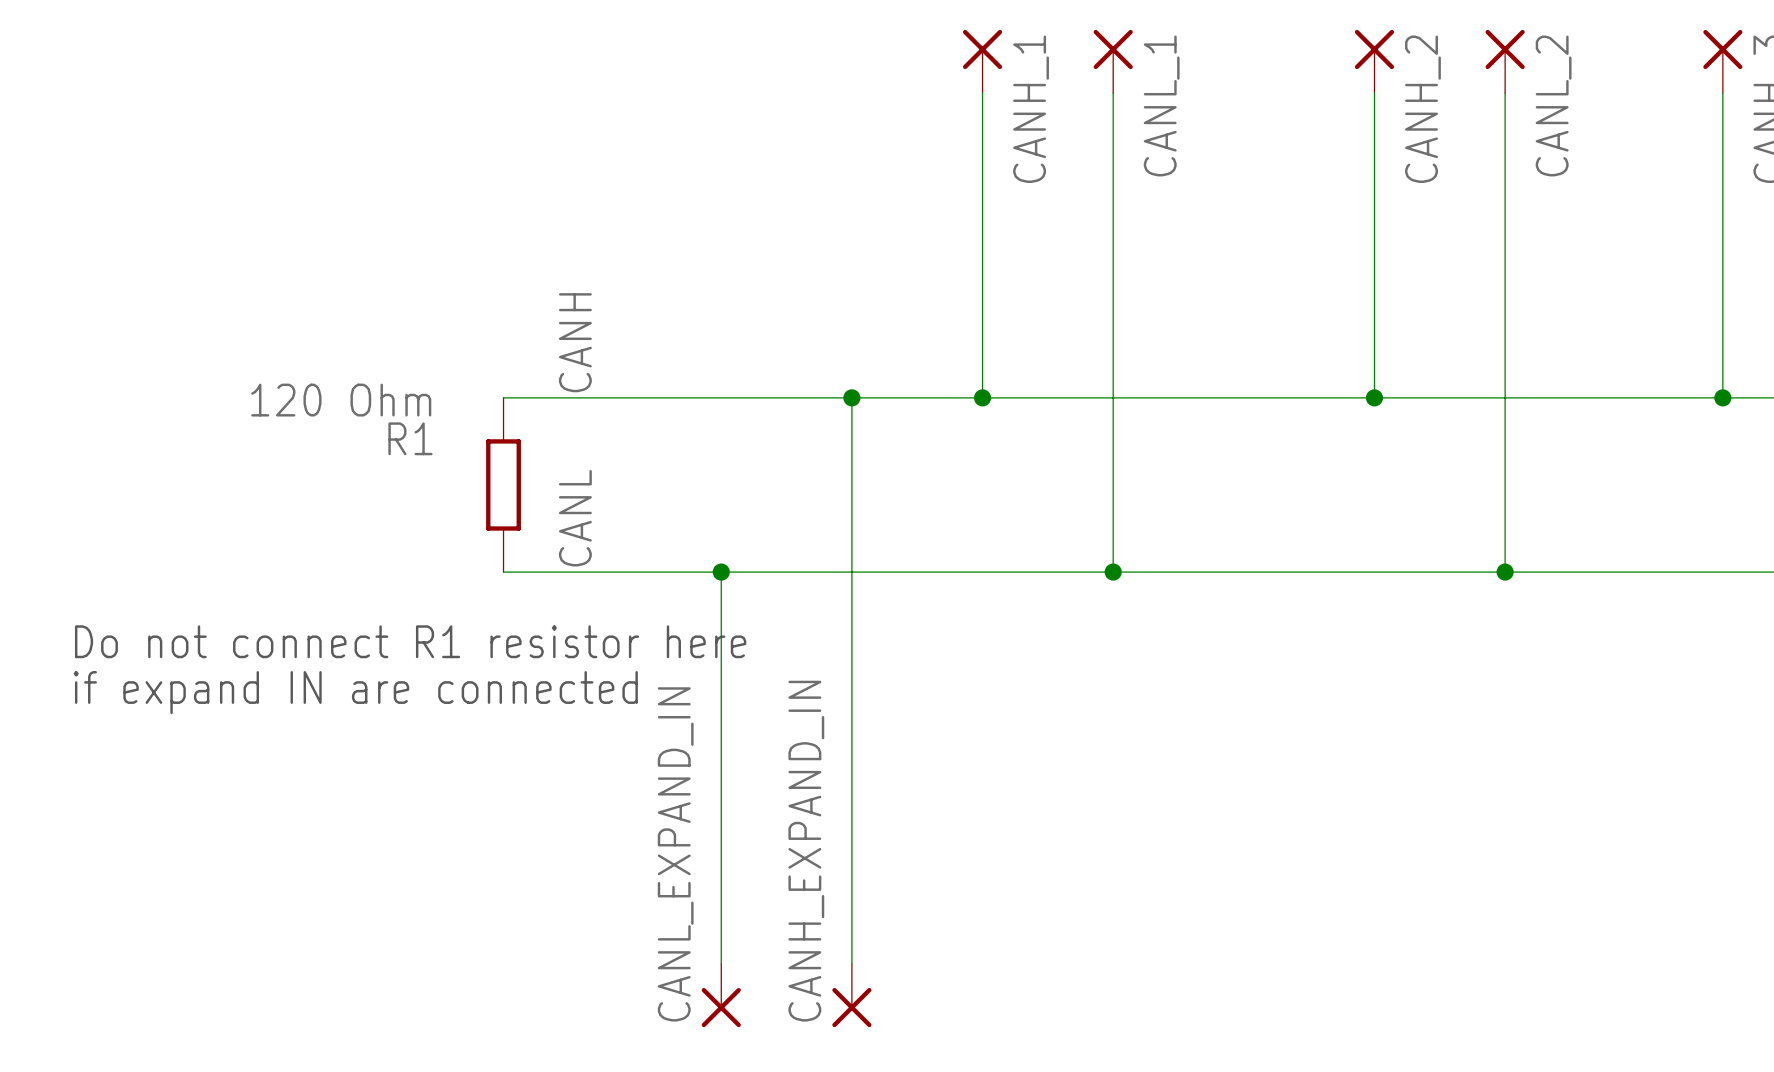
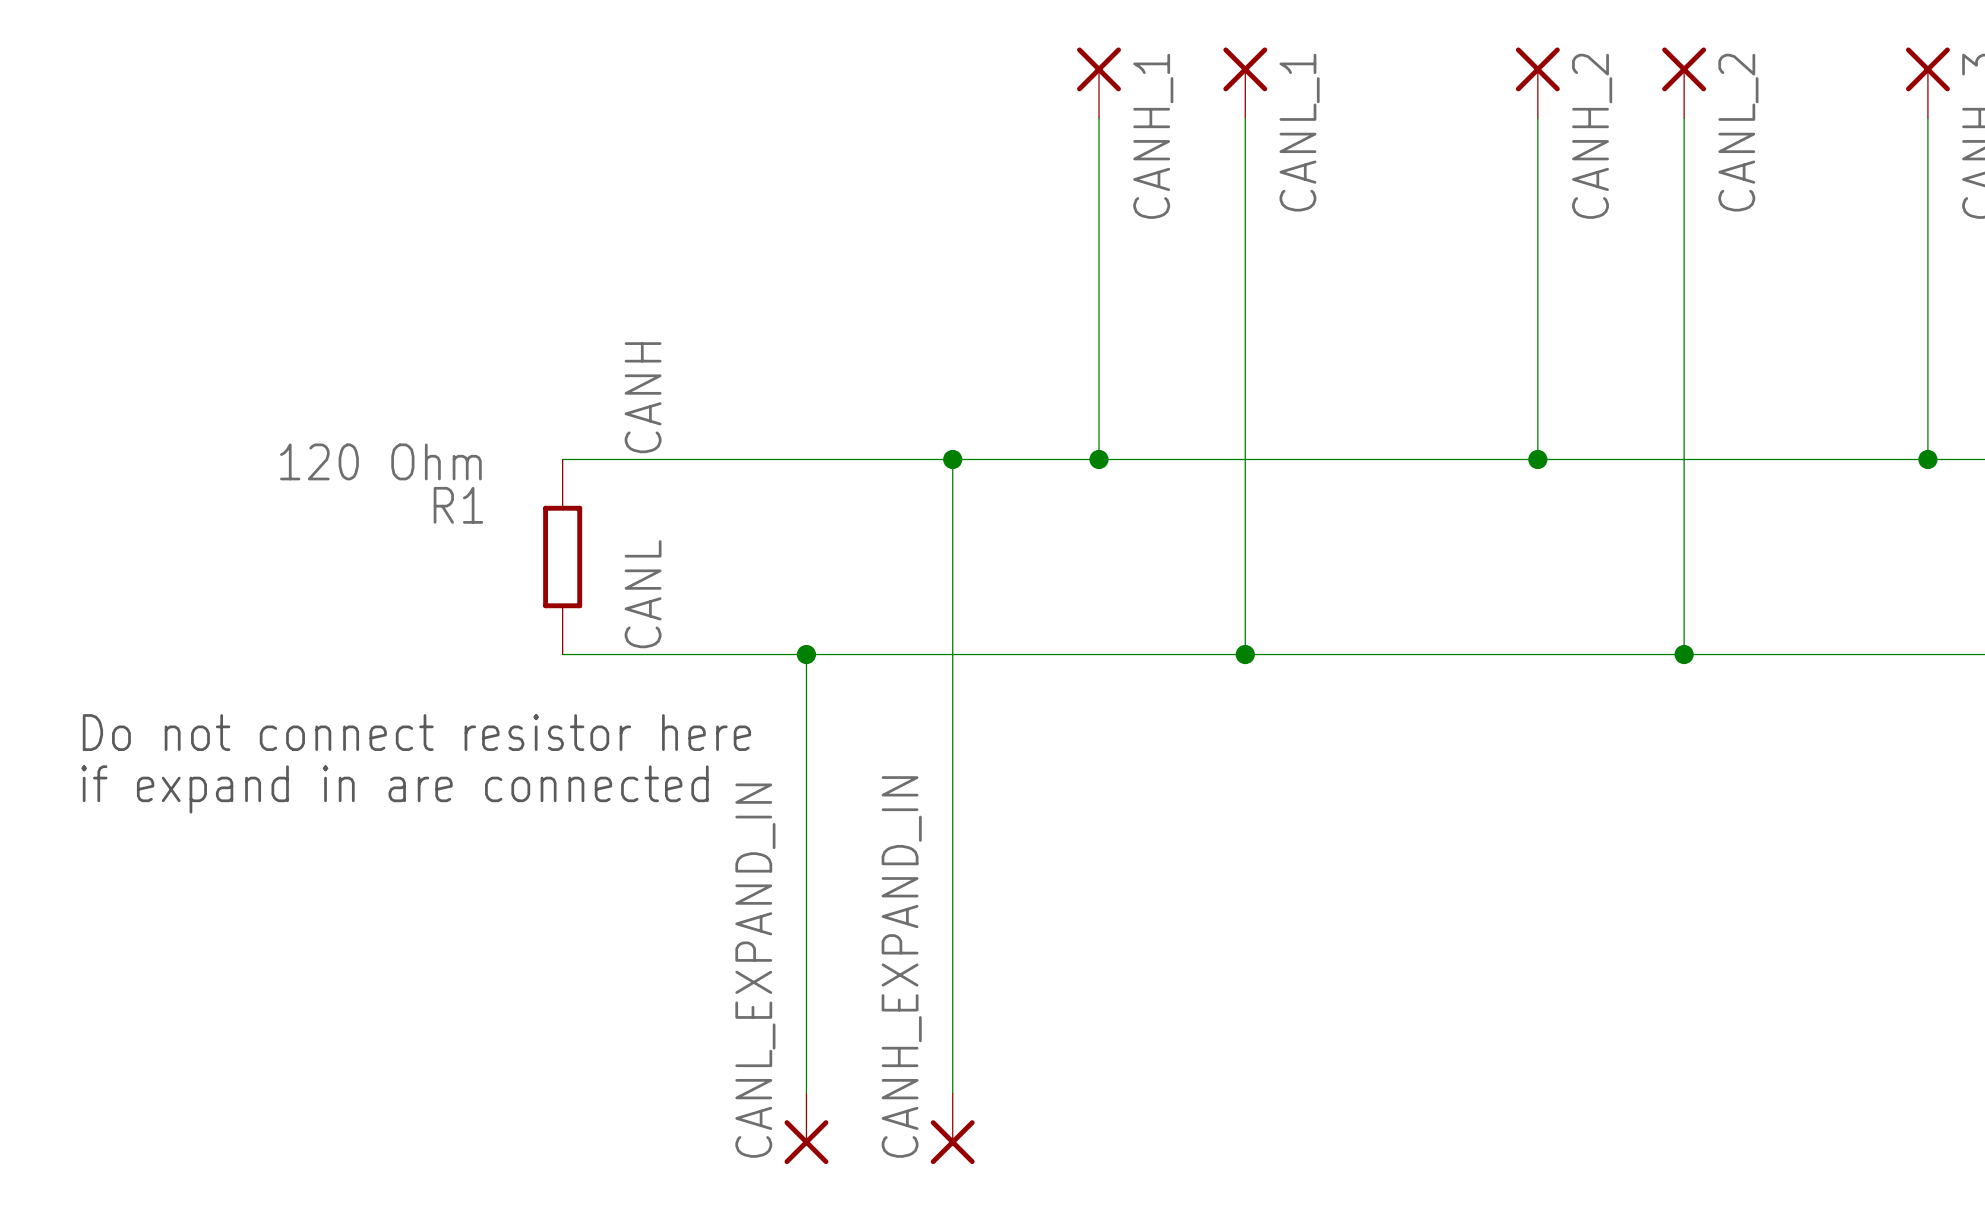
text: Do not connect R1 resistor here (410, 641) -> Do not connect resistor here (416, 732)
text: if expand IN are connected (355, 692) -> if expand in are connected (395, 789)

